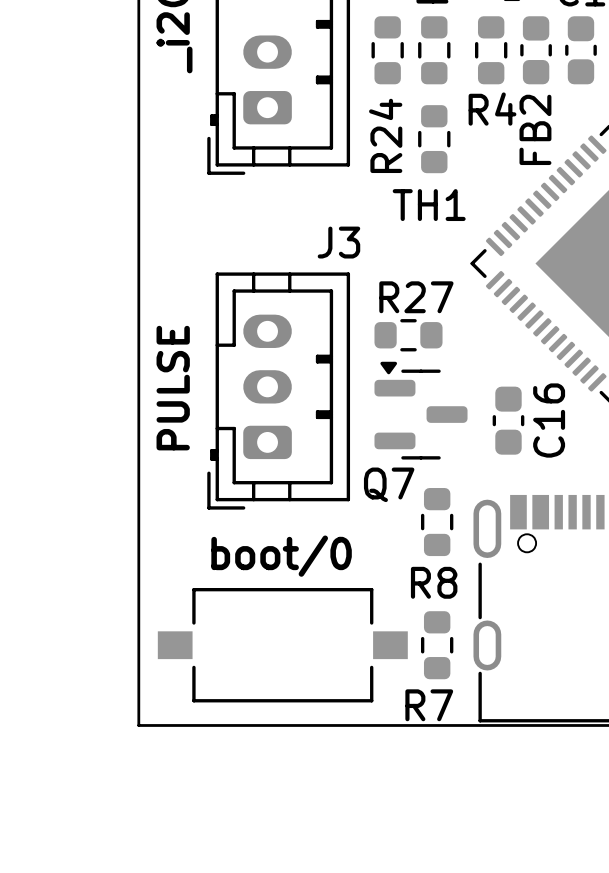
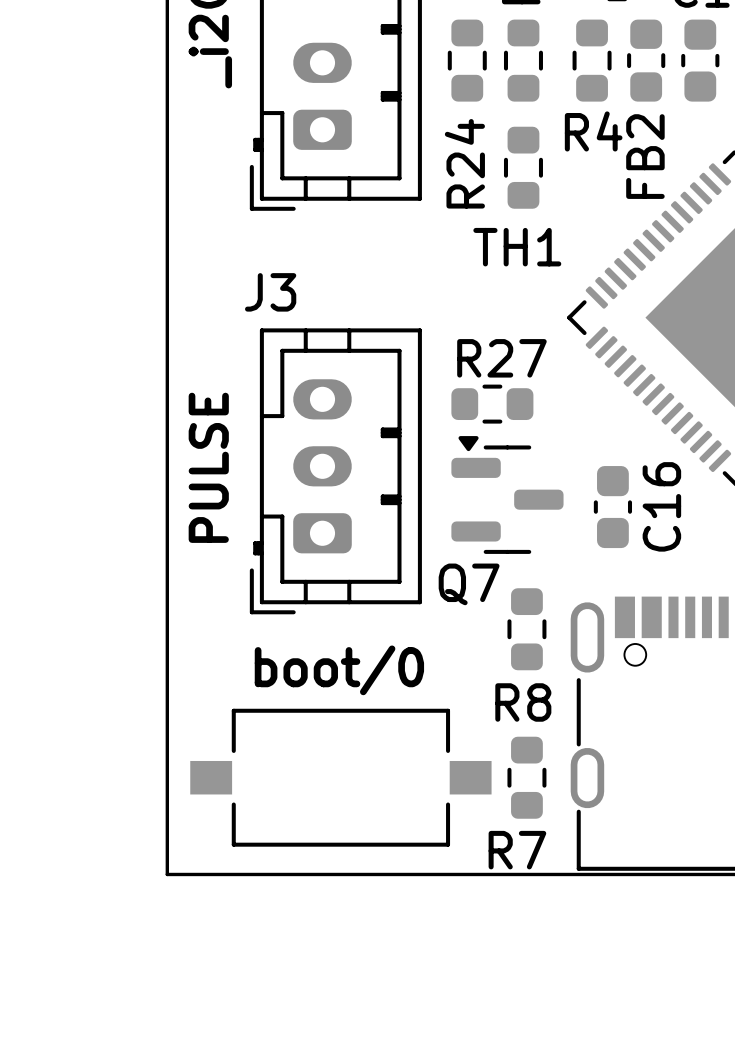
J3 name position: J3 (338, 242) -> J3 (270, 292)

